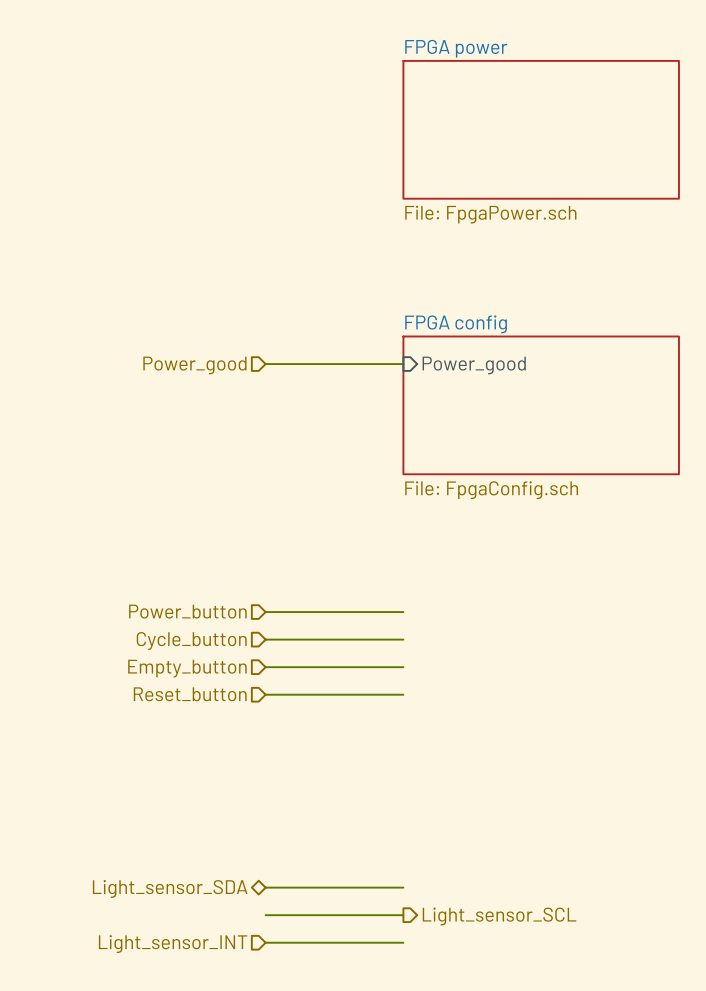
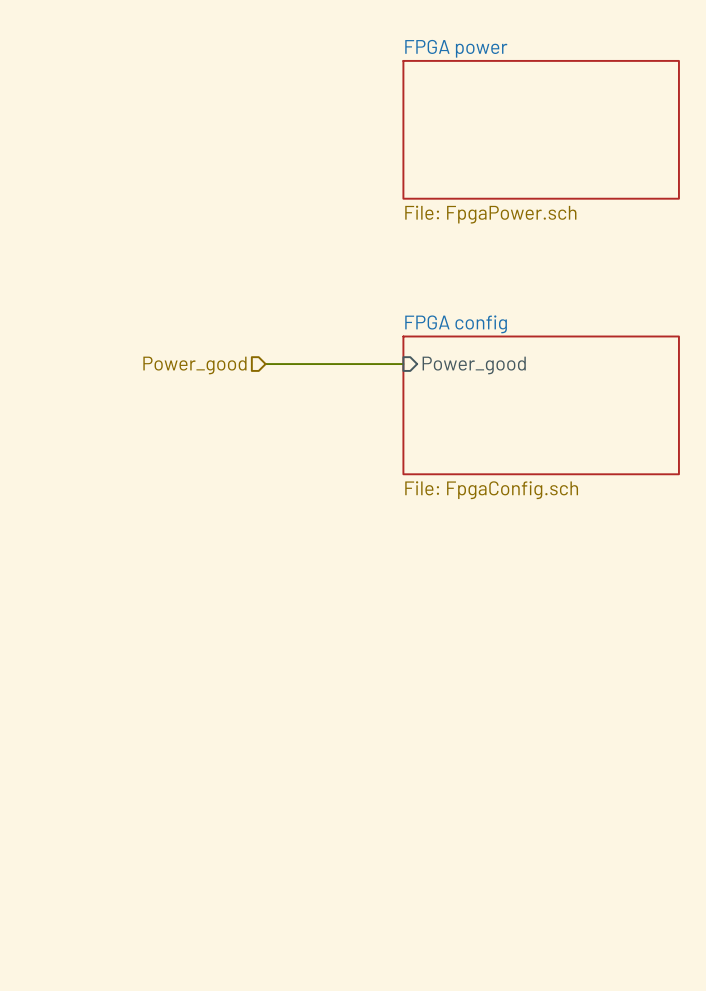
hierarchical label: Power_button (187, 611) -> none
wire: (265, 612) (403, 612) -> none
wire: (265, 639) (403, 639) -> none
hierarchical label: Cycle_button (191, 640) -> none
wire: (265, 667) (403, 667) -> none
hierarchical label: Empty_button (187, 668) -> none
hierarchical label: Reset_button (190, 694) -> none
wire: (265, 694) (403, 694) -> none
wire: (265, 887) (403, 887) -> none
hierarchical label: Light_sensor_SDA (170, 888) -> none
wire: (265, 915) (403, 915) -> none
hierarchical label: Light_sensor_SCL (499, 916) -> none
wire: (265, 942) (403, 942) -> none
hierarchical label: Light_sensor_INT (173, 944) -> none

